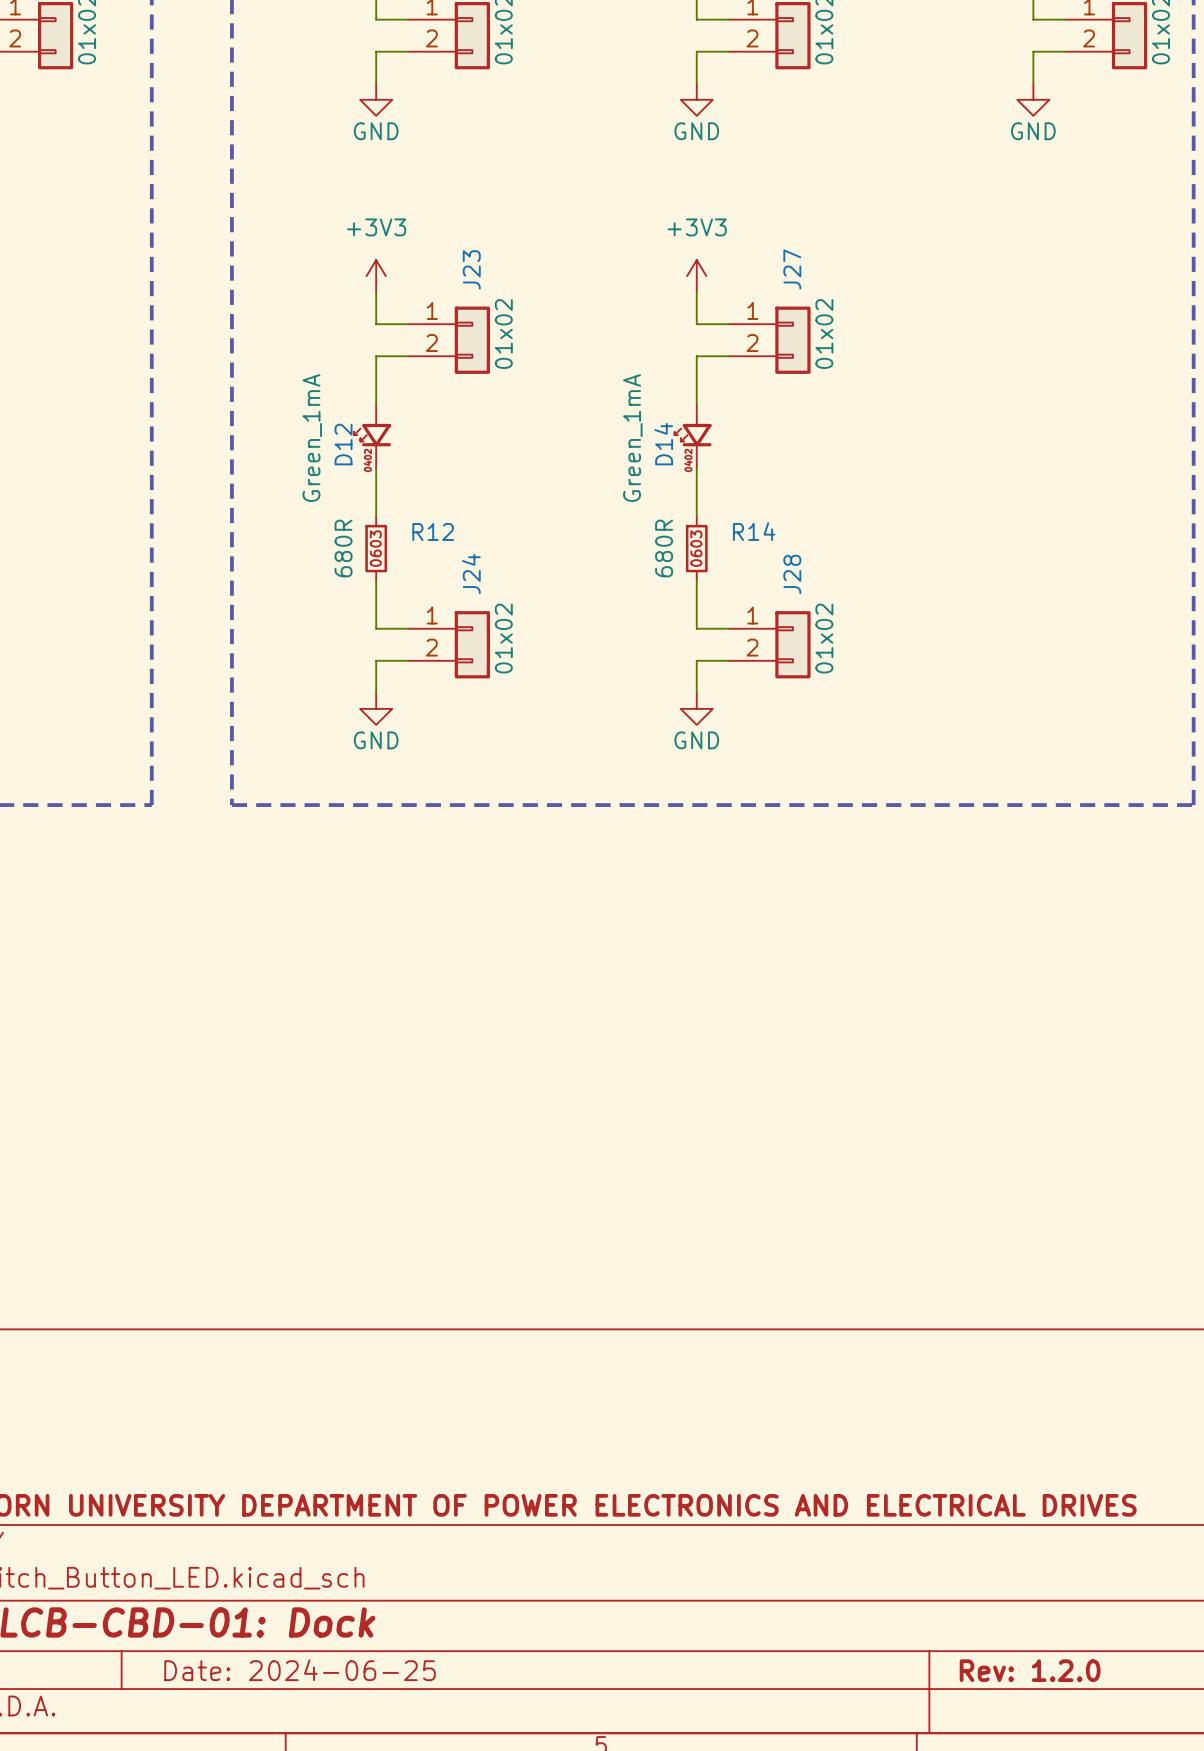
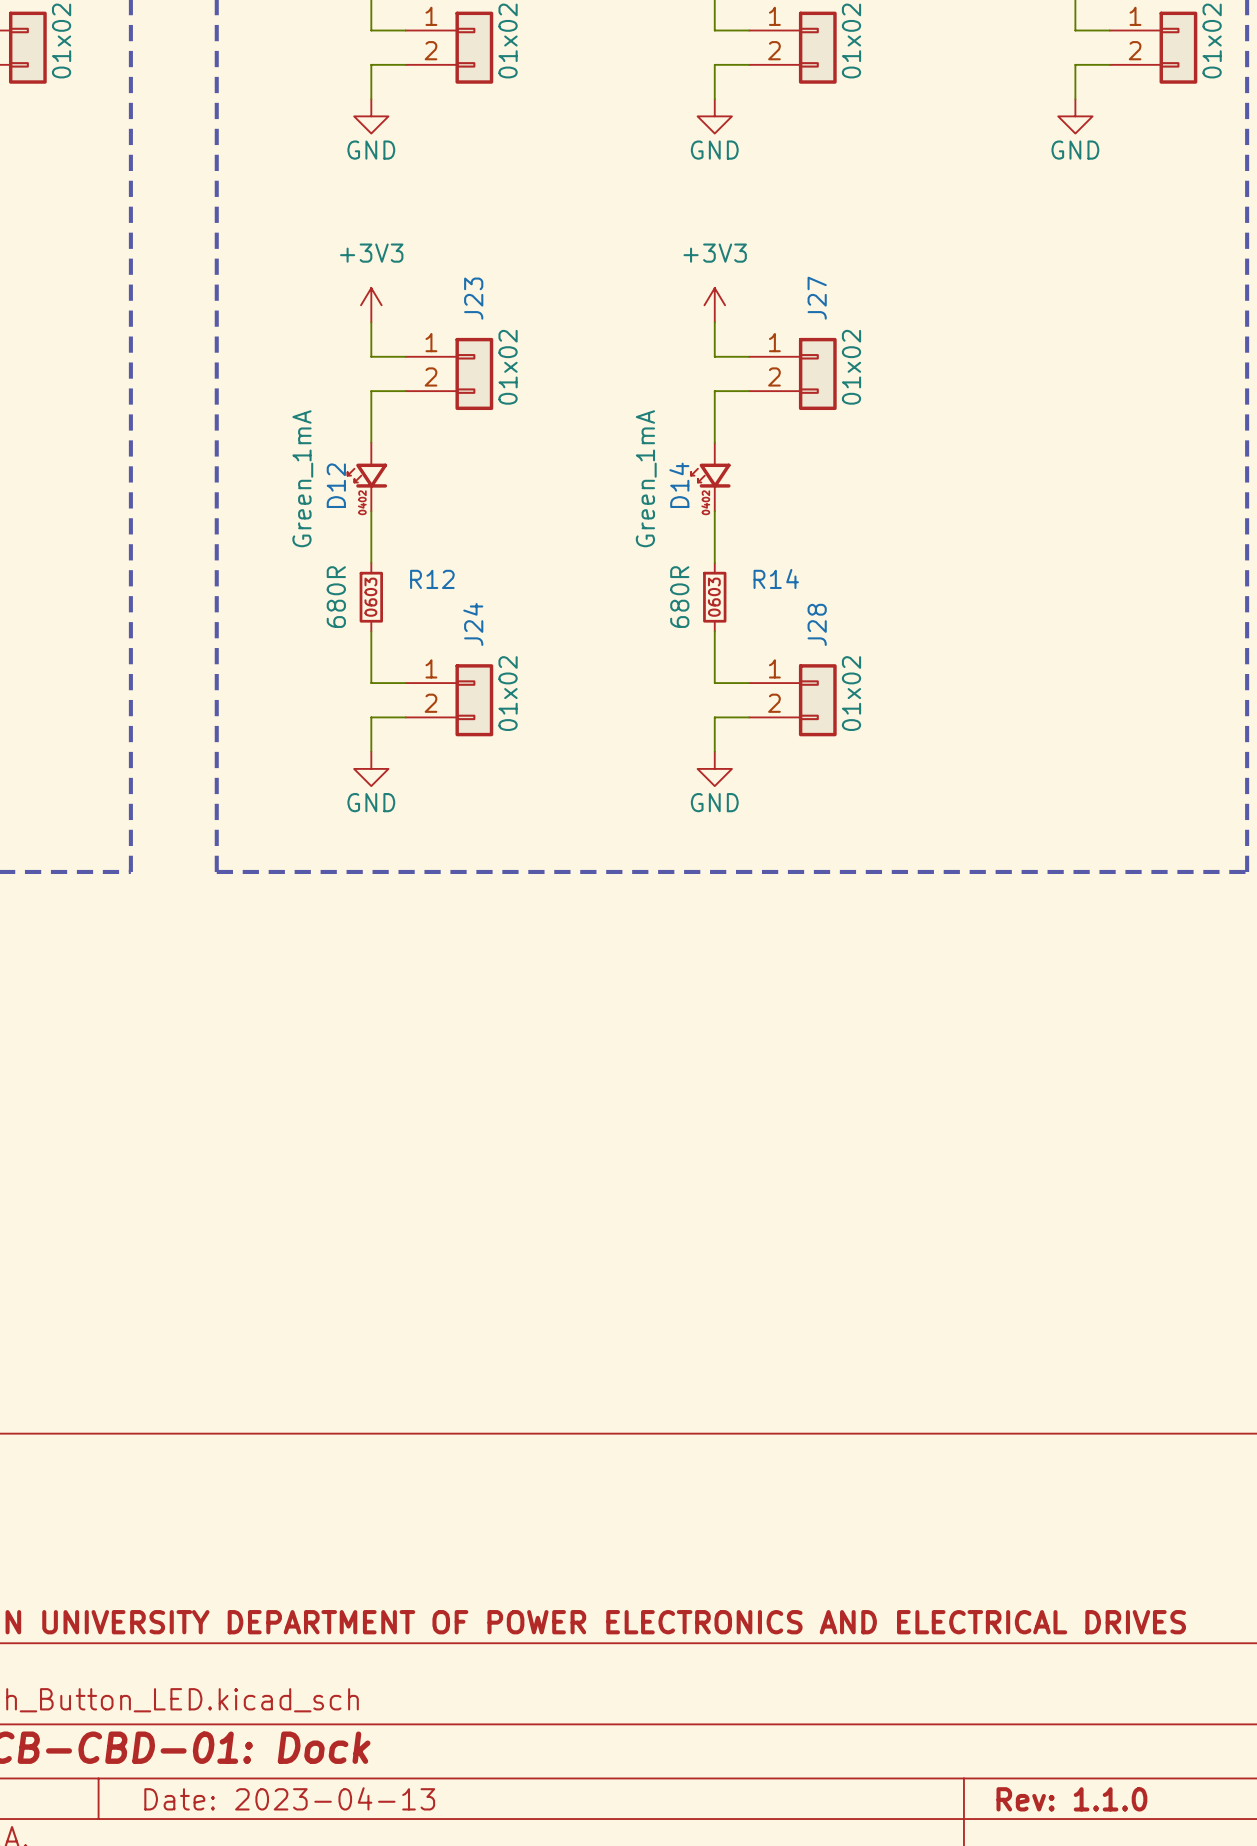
title block: Date: 2024-06-25 (300, 1670) -> Date: 2023-04-13 (289, 1798)
title block: Rev: 1.2.0 (1030, 1670) -> Rev: 1.1.0 (1071, 1799)

